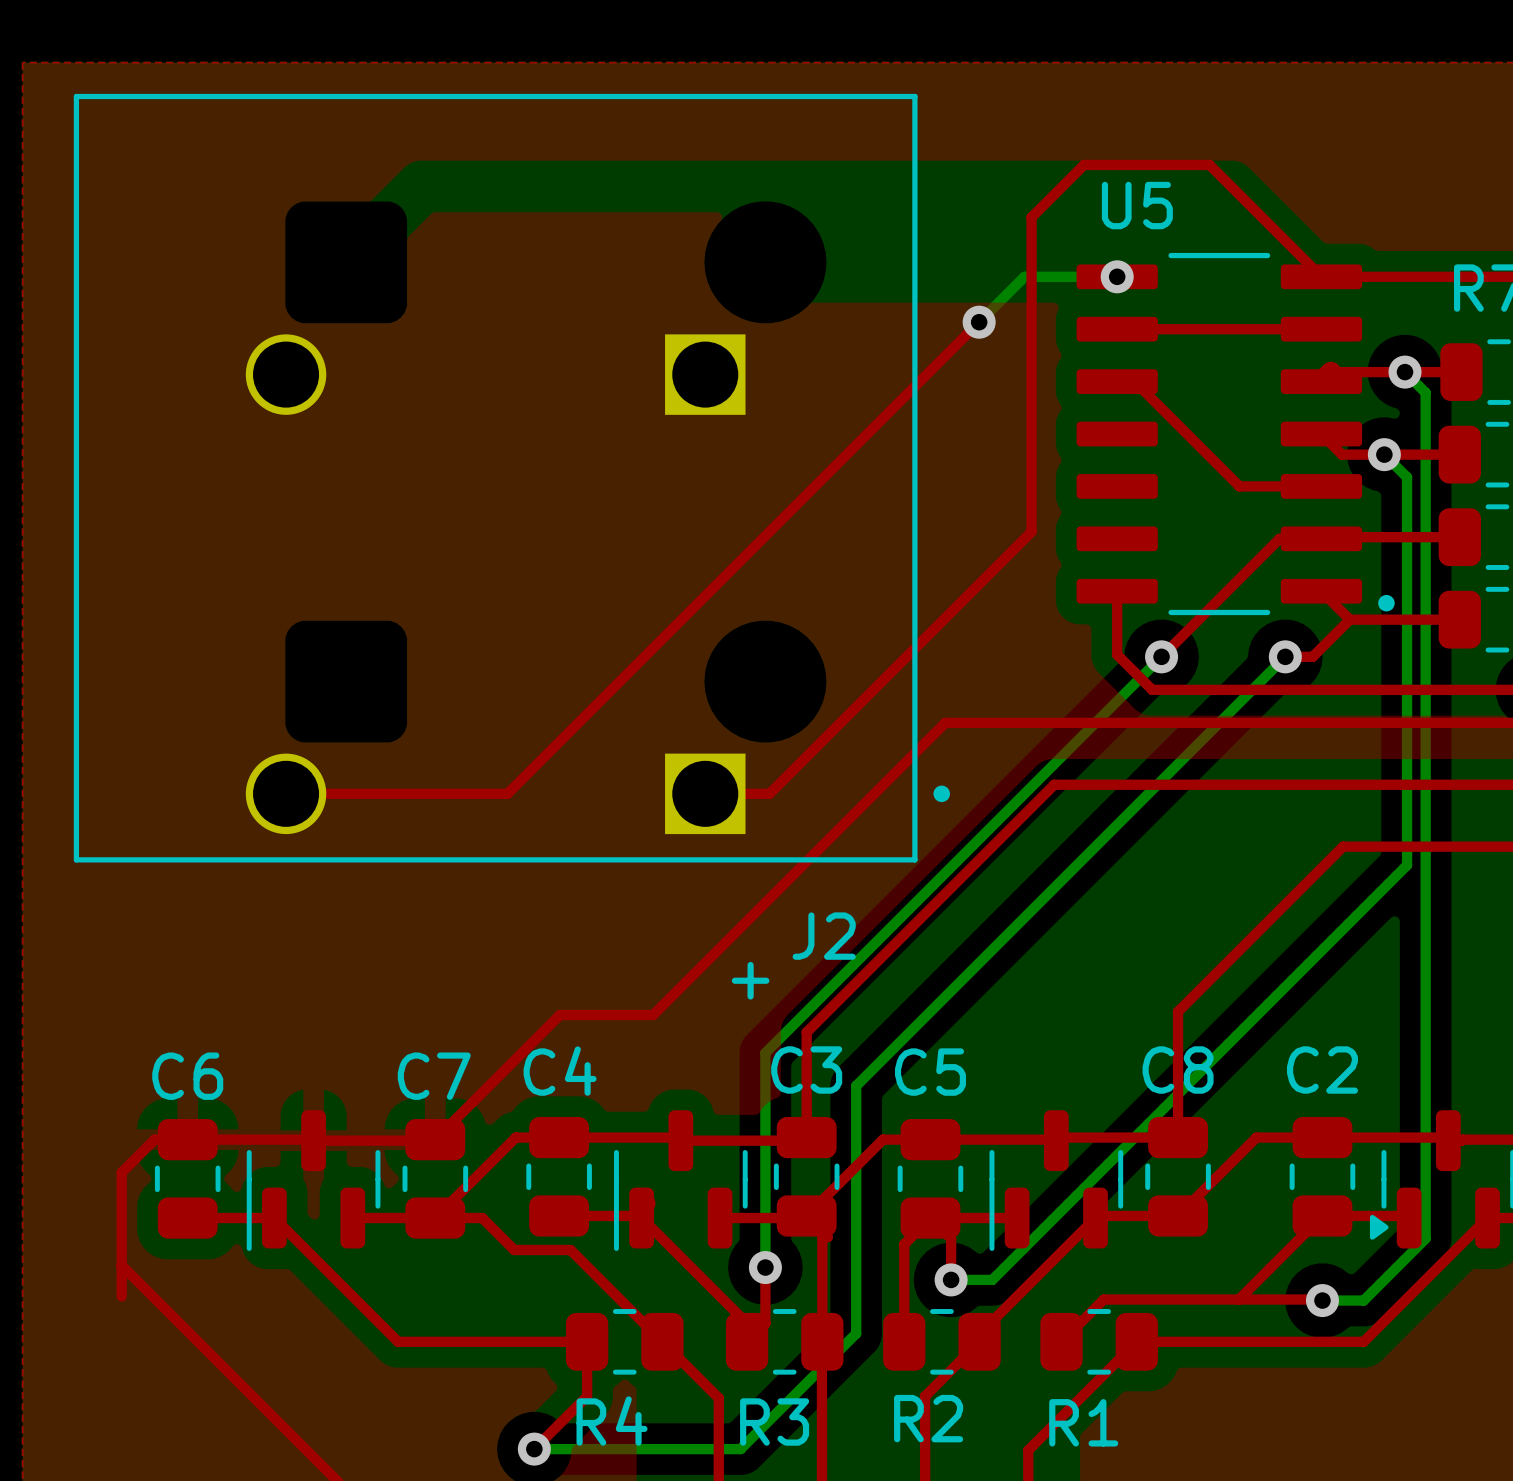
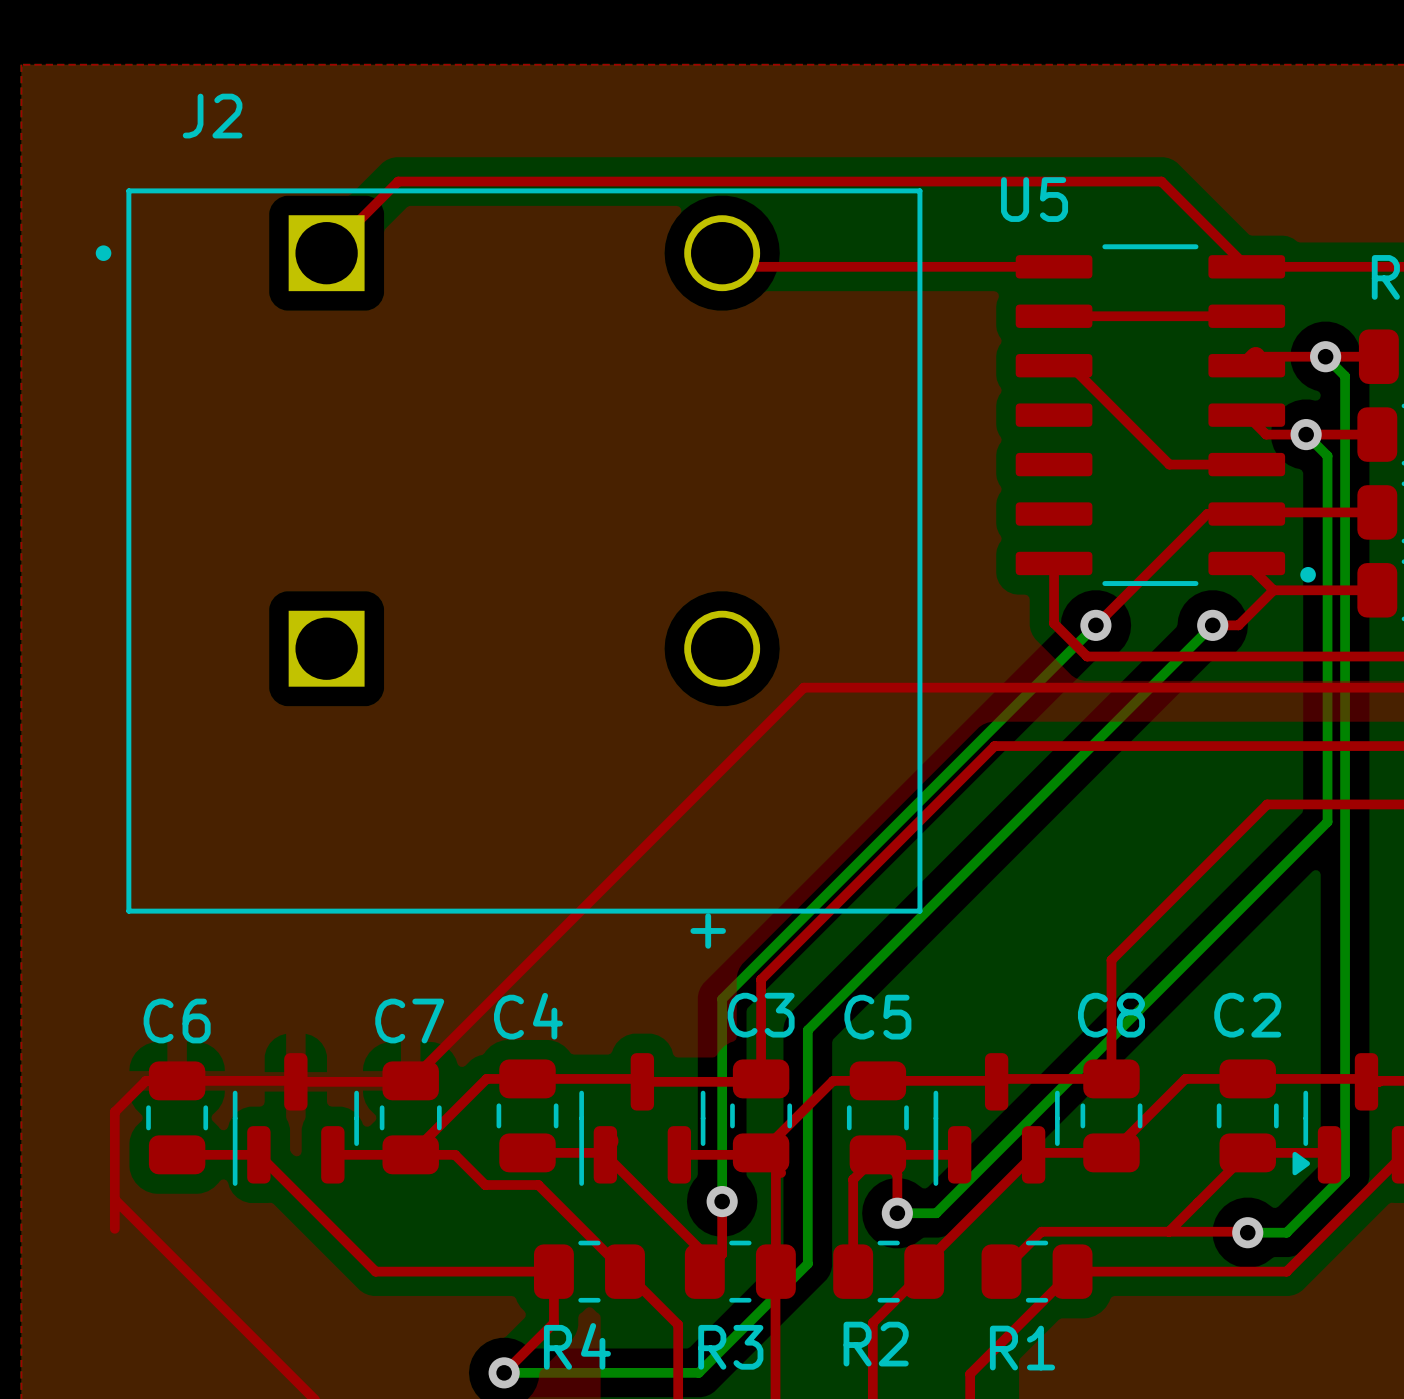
top track: (1231, 186) (1209, 164) (1083, 164) (1031, 217) (1031, 531) (769, 793) (717, 793) -> (1161, 181) (398, 181) (326, 253)
U5 name position: U5 (1137, 205) -> U5 (1034, 199)
top track: none -> (722, 253) (735, 266) (1054, 266)
bottom track: (1117, 276) (1024, 276) (979, 322) -> none
via: (1117, 276) -> none
top track: (979, 322) (507, 793) (286, 793) -> none
via: (979, 322) -> none
J2 rotation: 0° (511, 478) -> 180° (509, 551)
top track: (945, 722) (653, 1015) (559, 1015) -> (891, 687) (803, 687) (528, 963)

